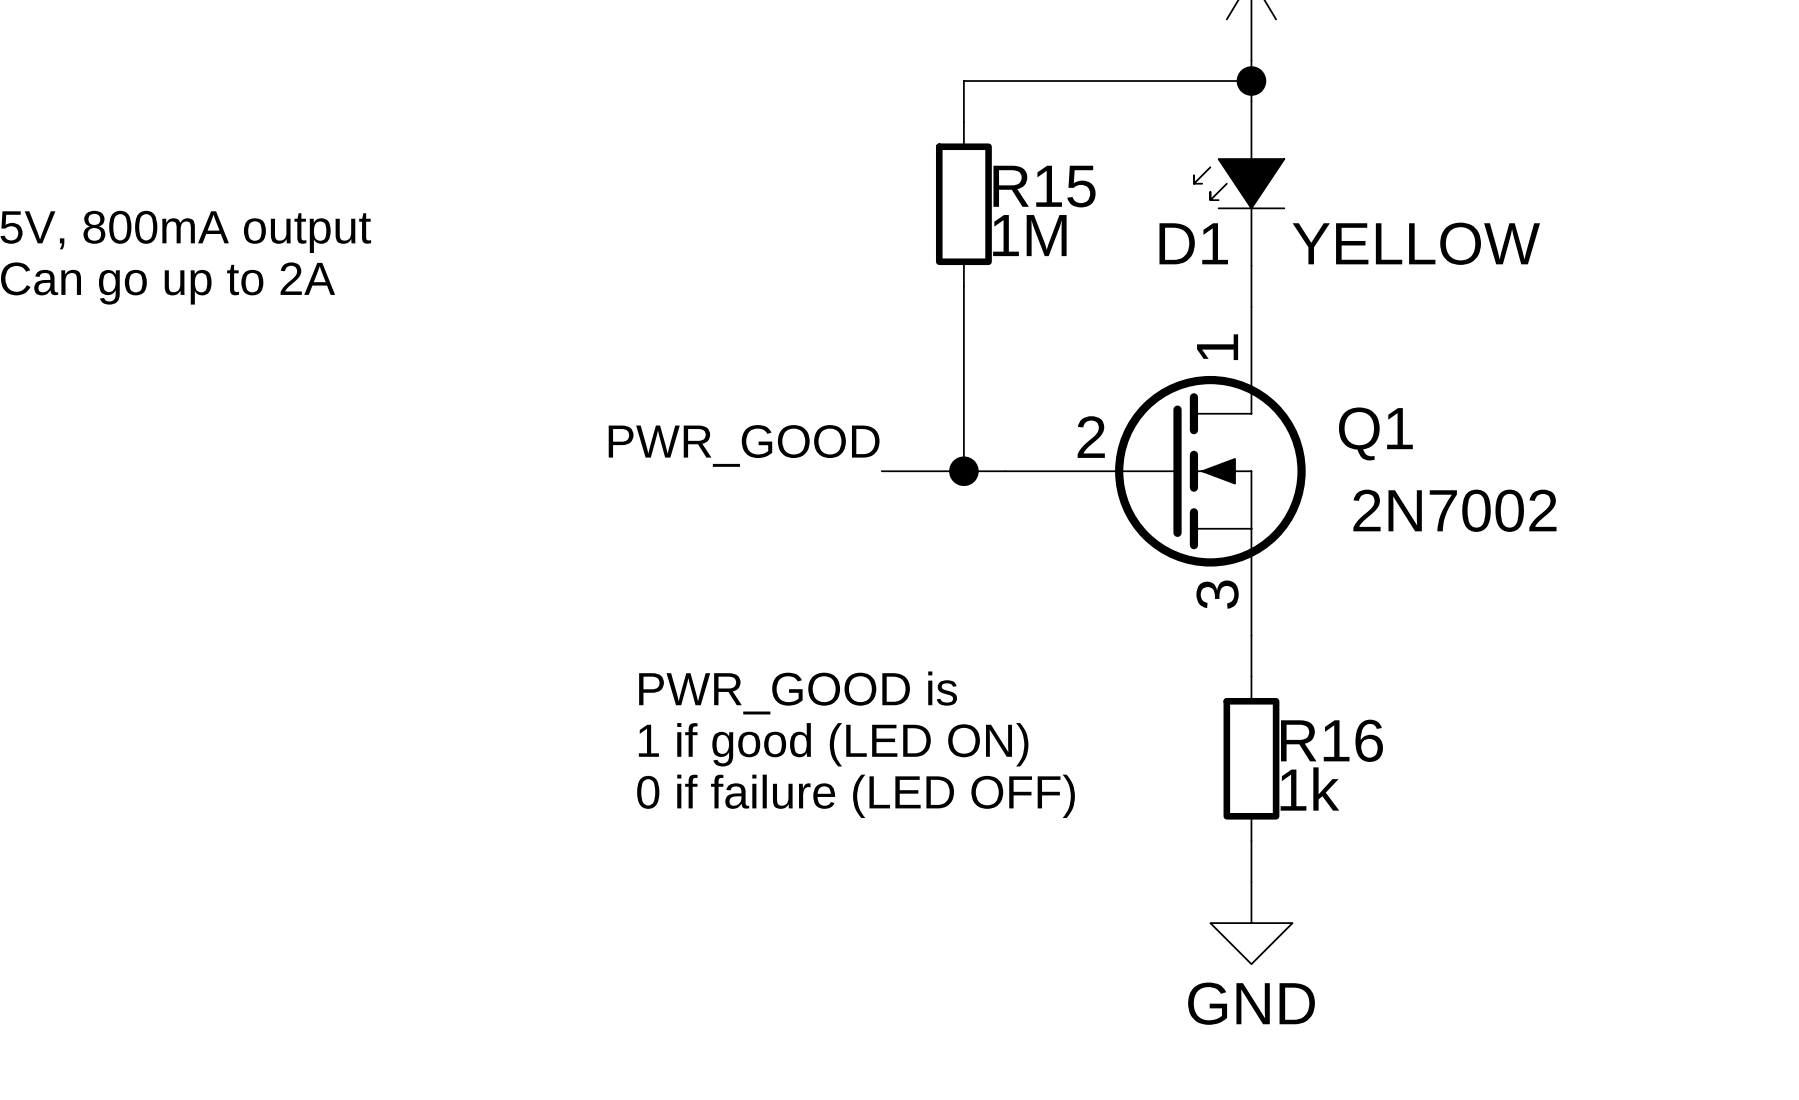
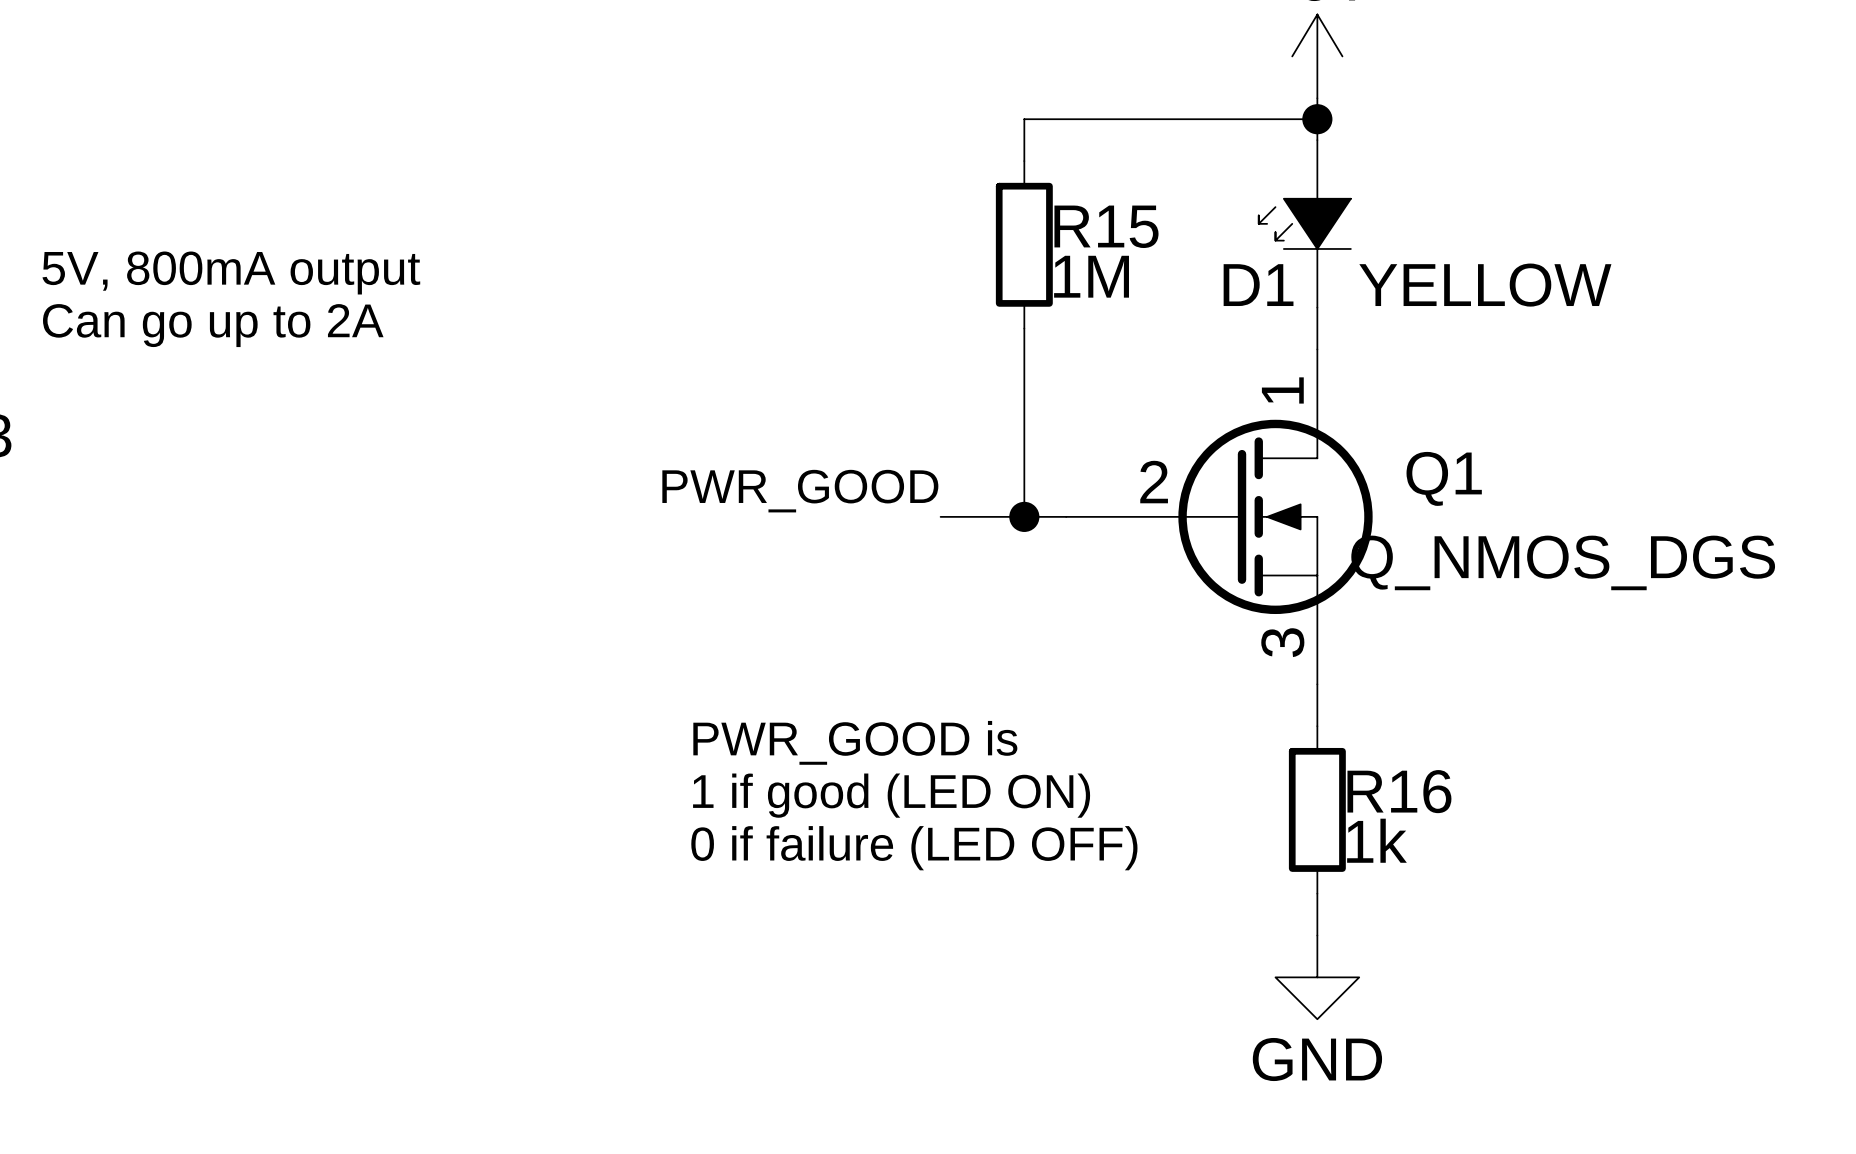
Q1 value: 2N7002 (1454, 510) -> Q_NMOS_DGS (1563, 562)

